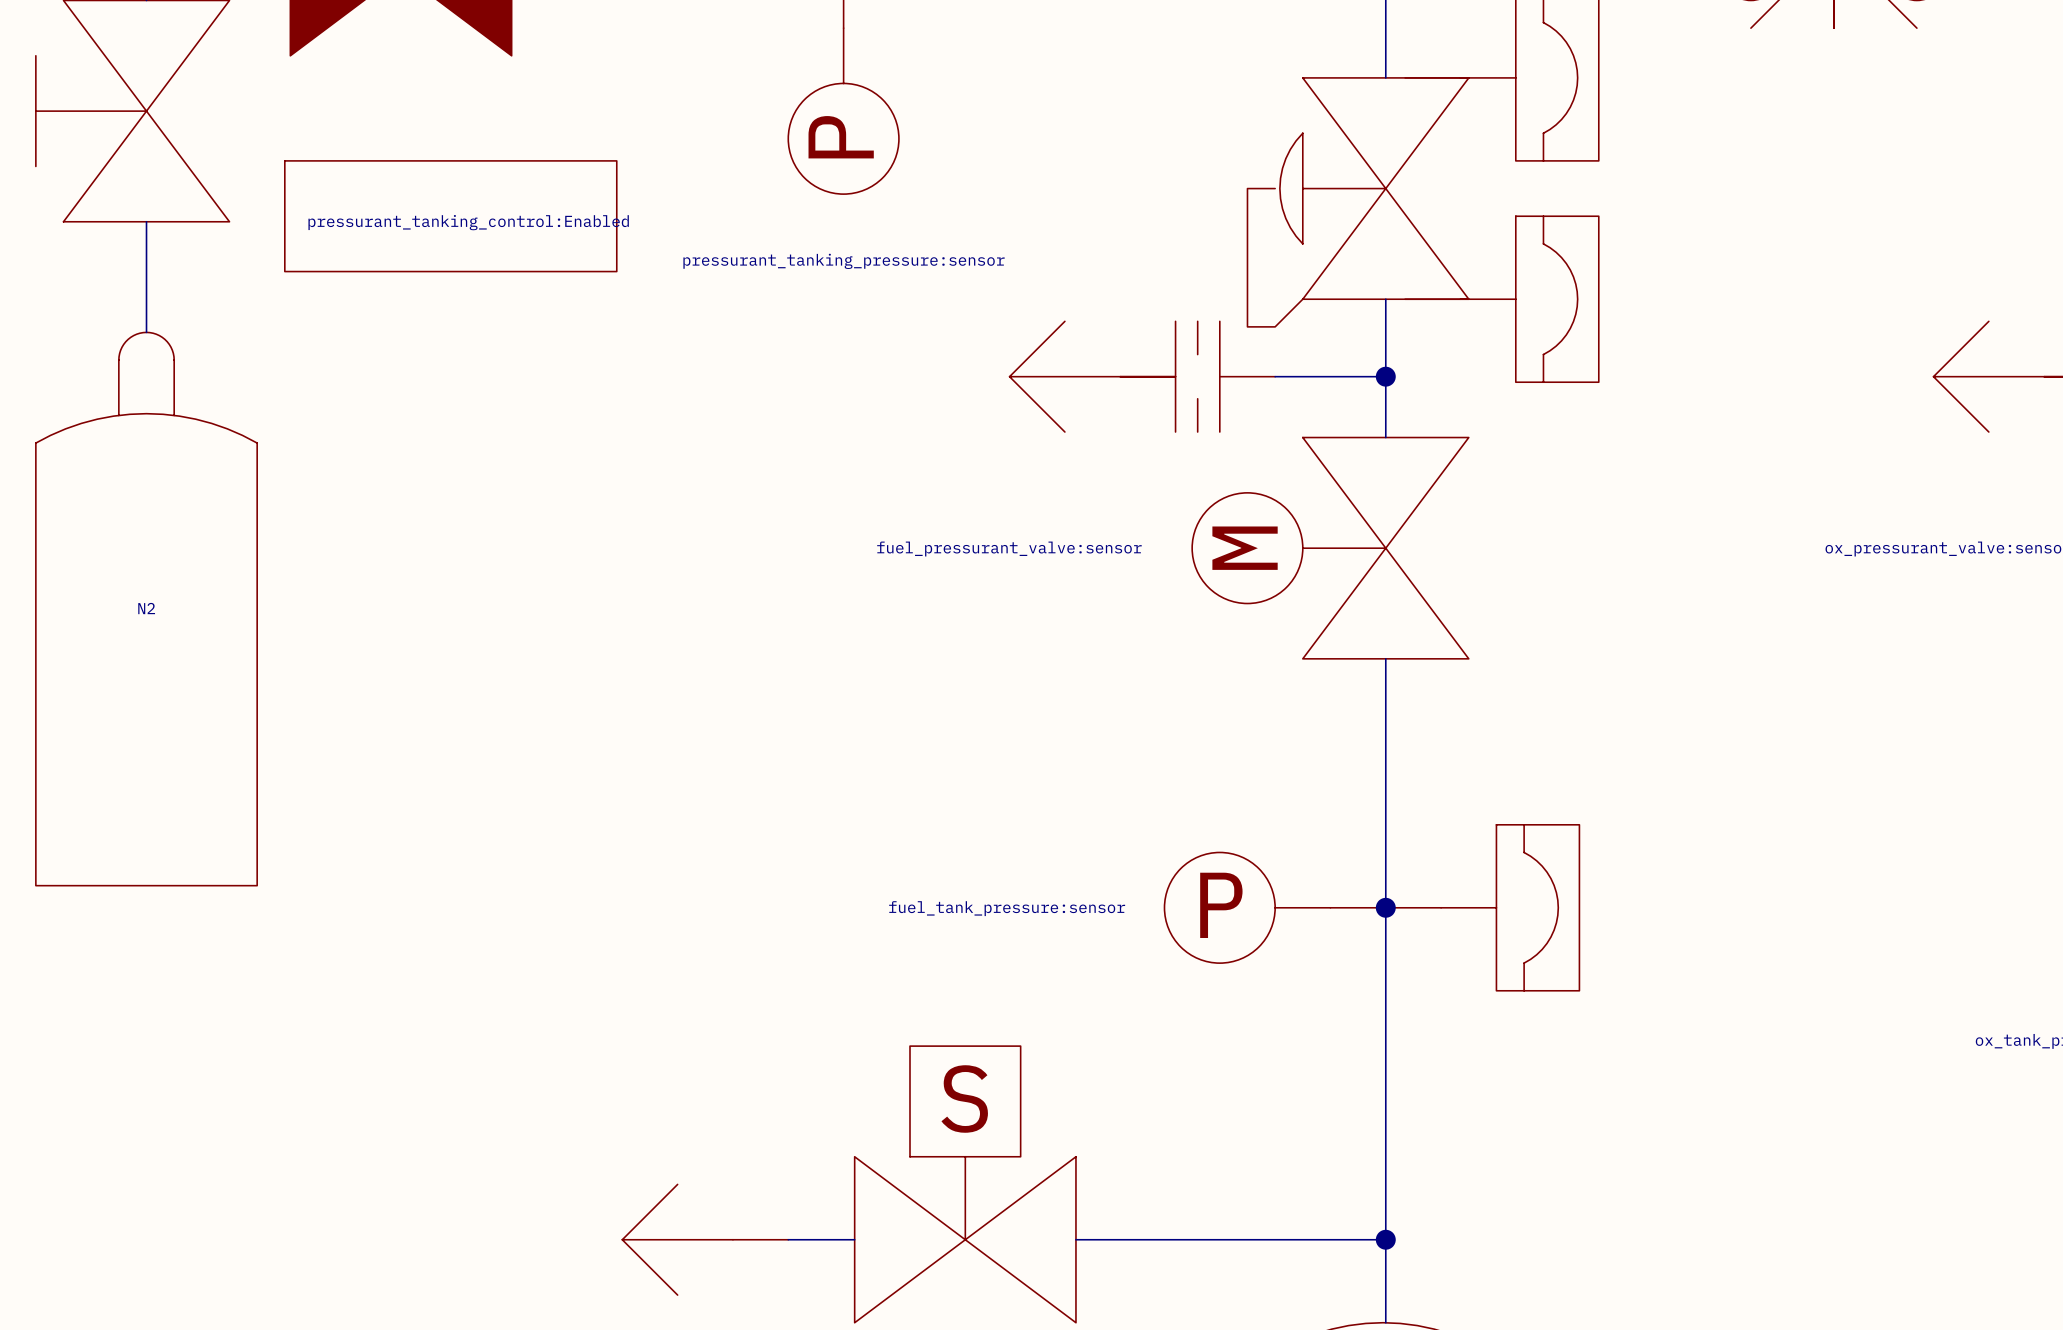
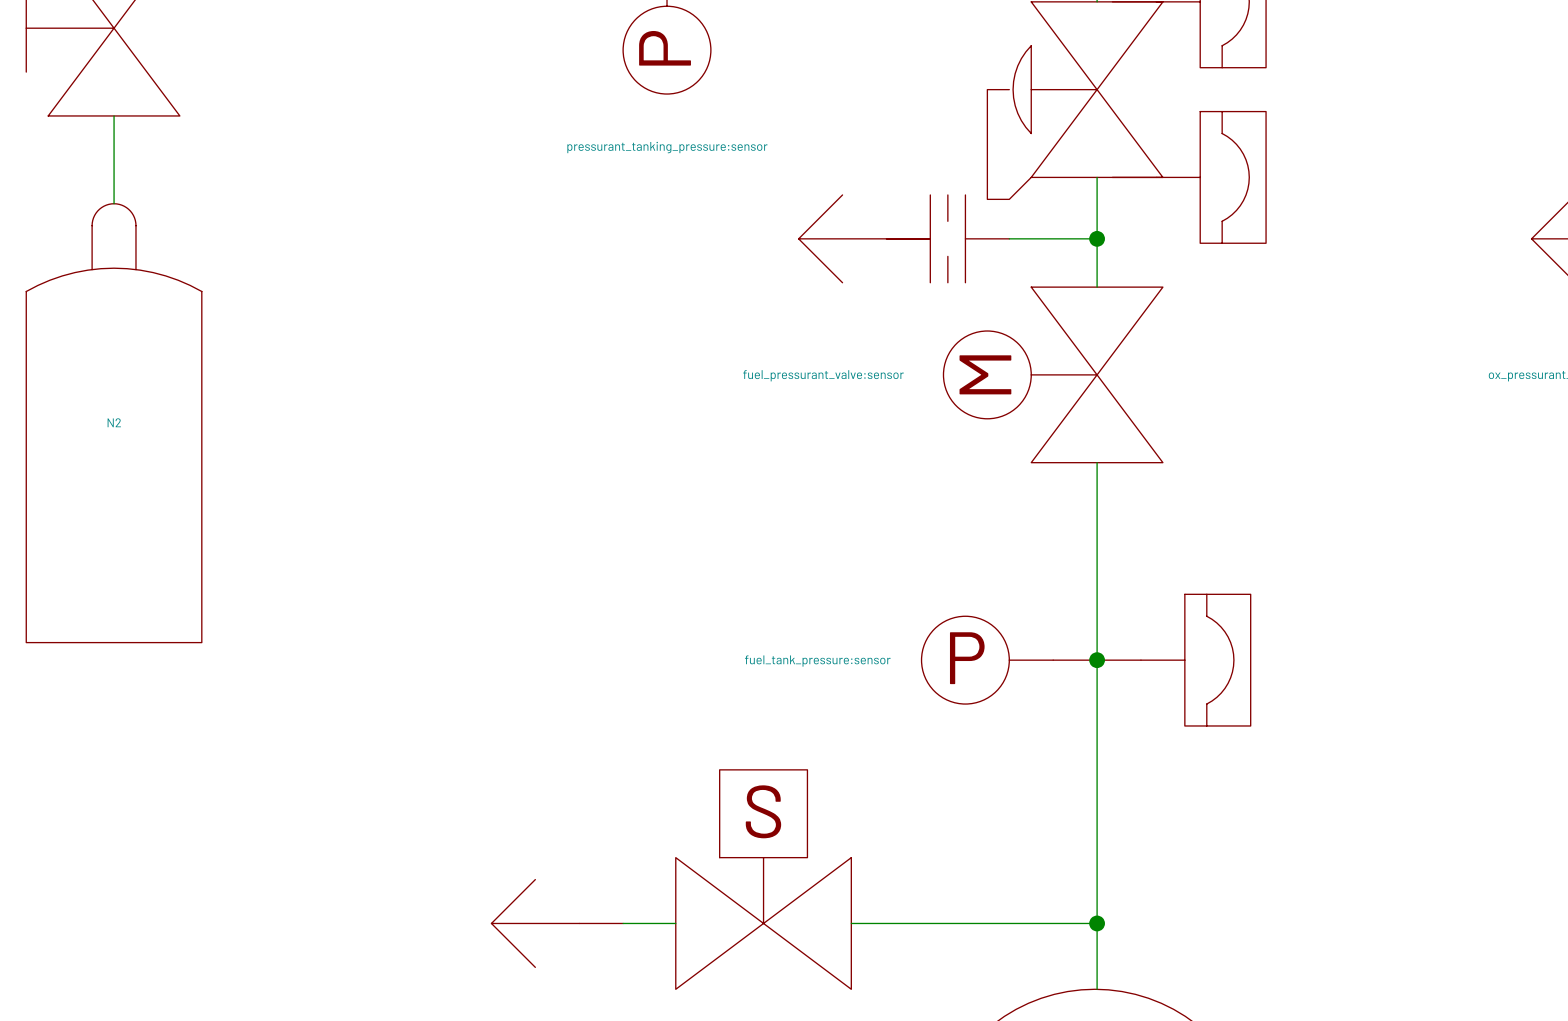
part: pressurant_tanking_control:Enabled (450, 216) -> none

